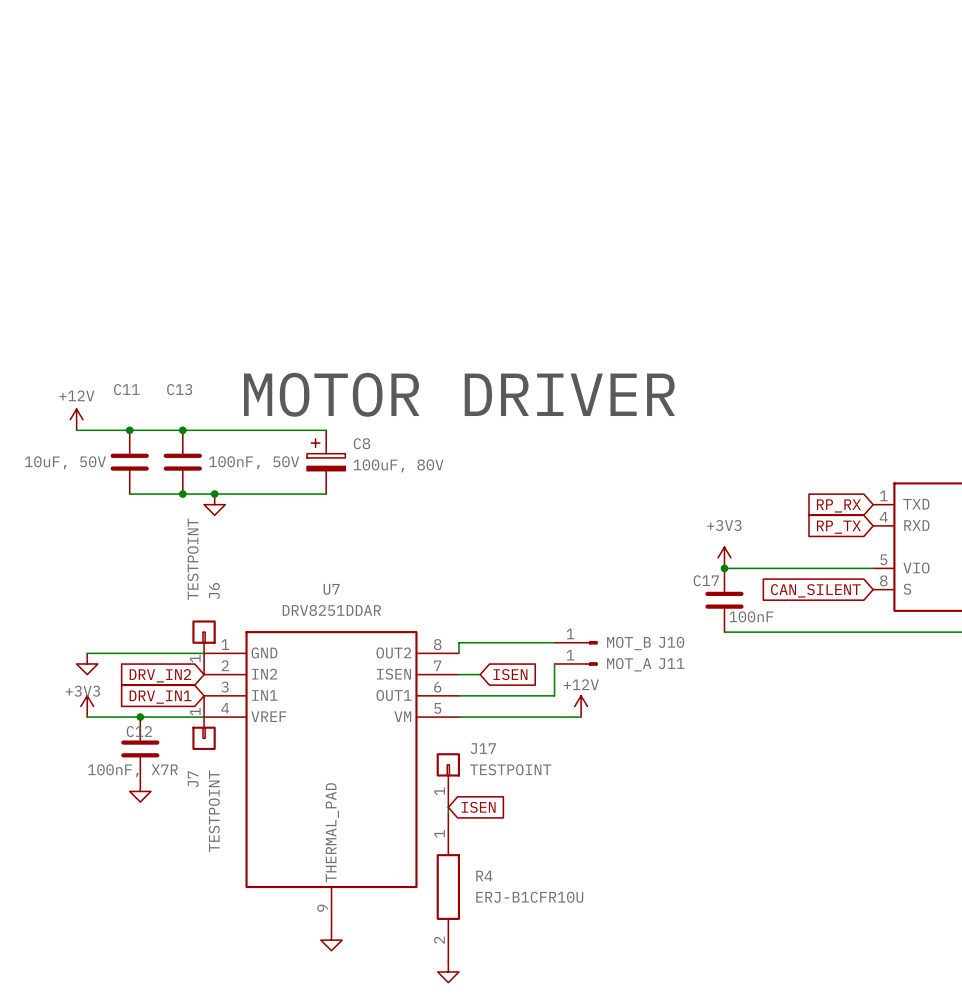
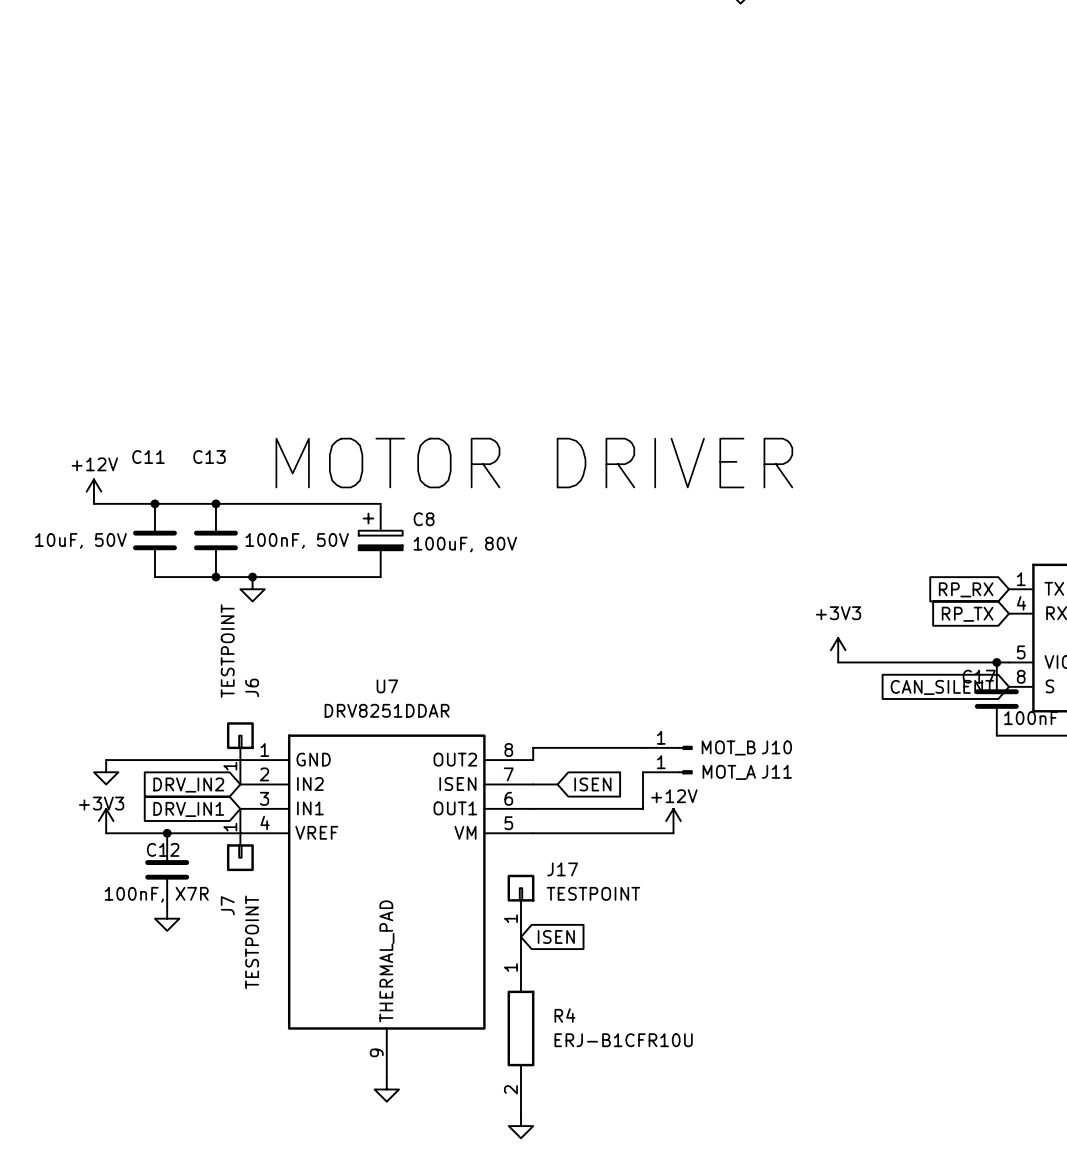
junction: (724, 568) -> none
junction: none -> (996, 662)
C17 position: (724, 600) -> (996, 699)
wire: (724, 632) (862, 632) -> none

